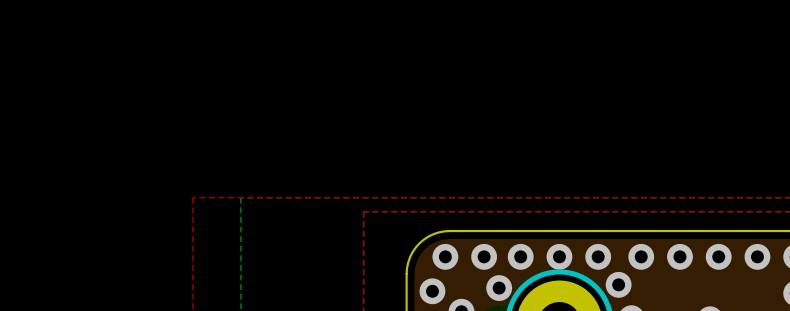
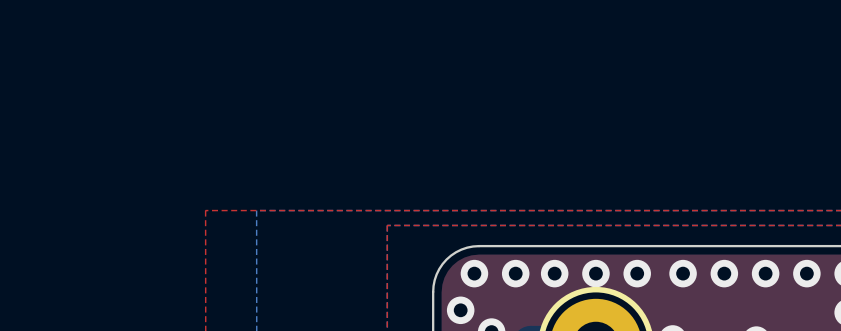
via: (618, 284) -> none
via: (499, 288) -> none

